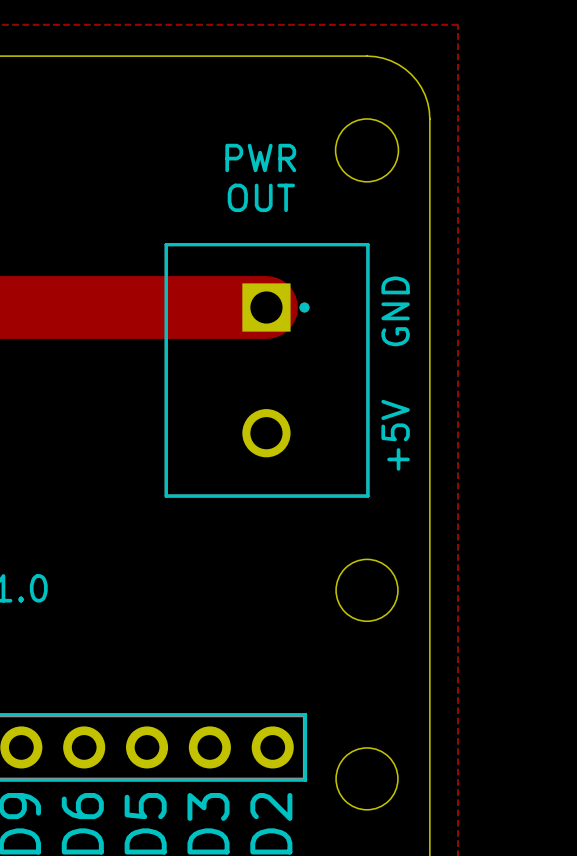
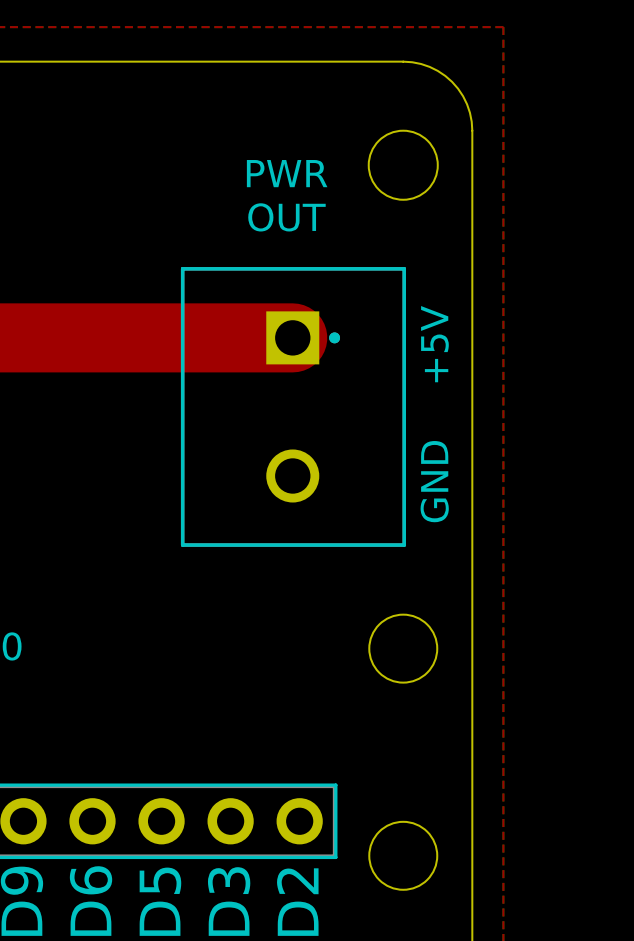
text: GND (395, 311) -> +5V (434, 344)
text: +5V (395, 435) -> GND (434, 481)

